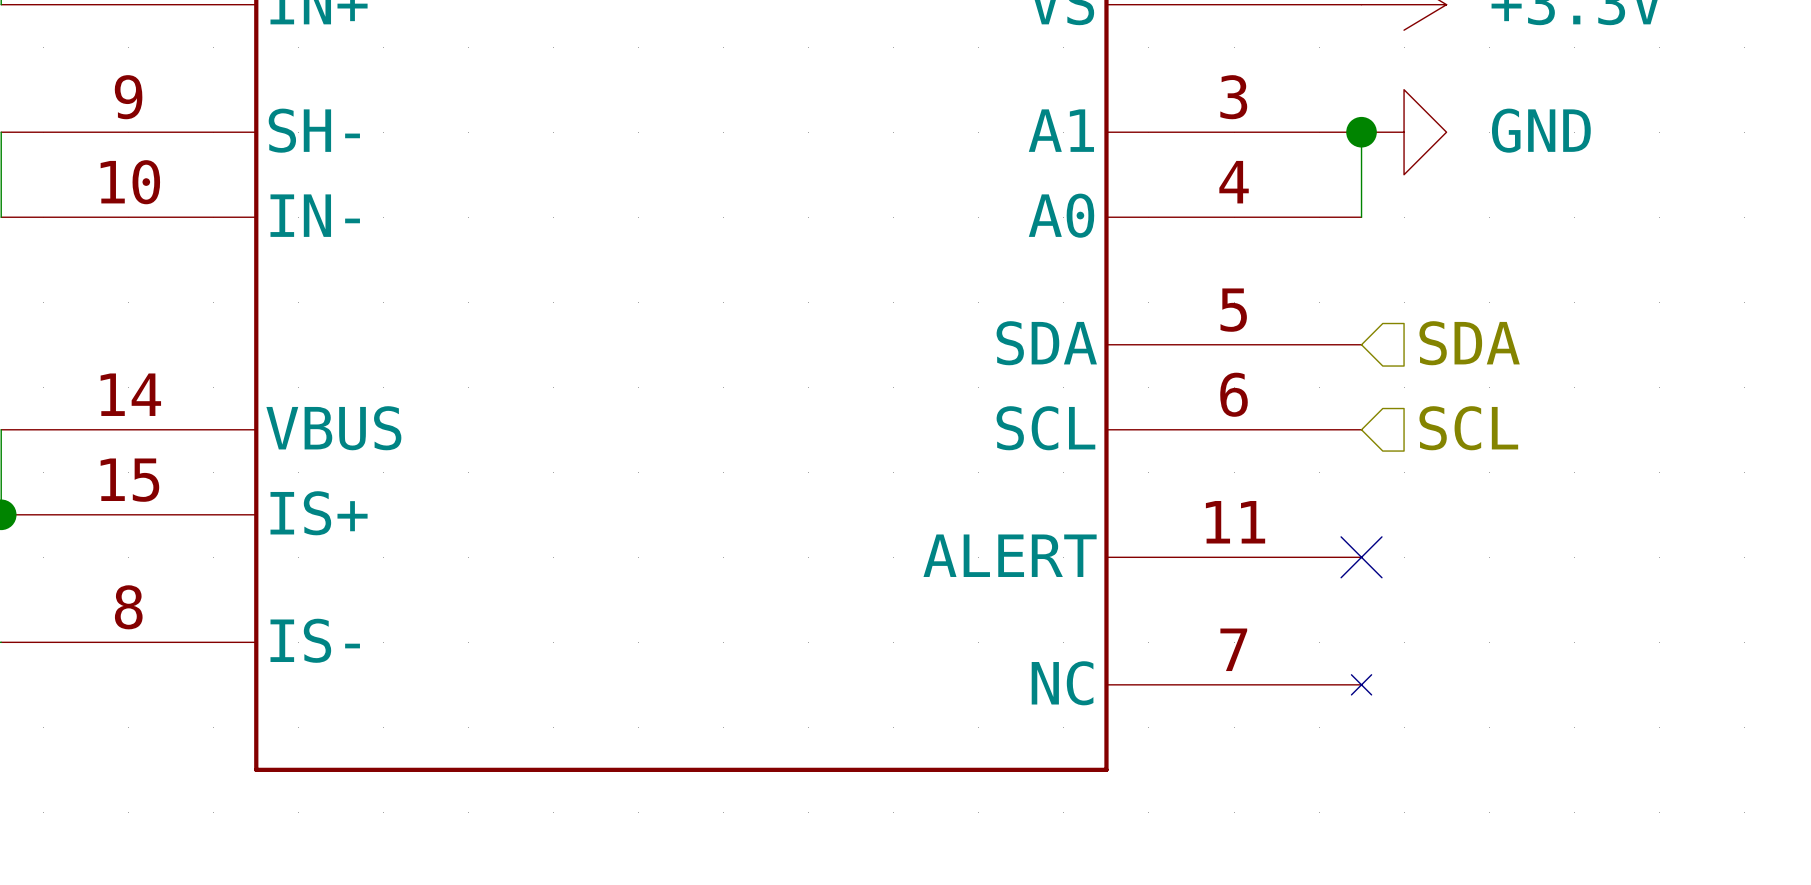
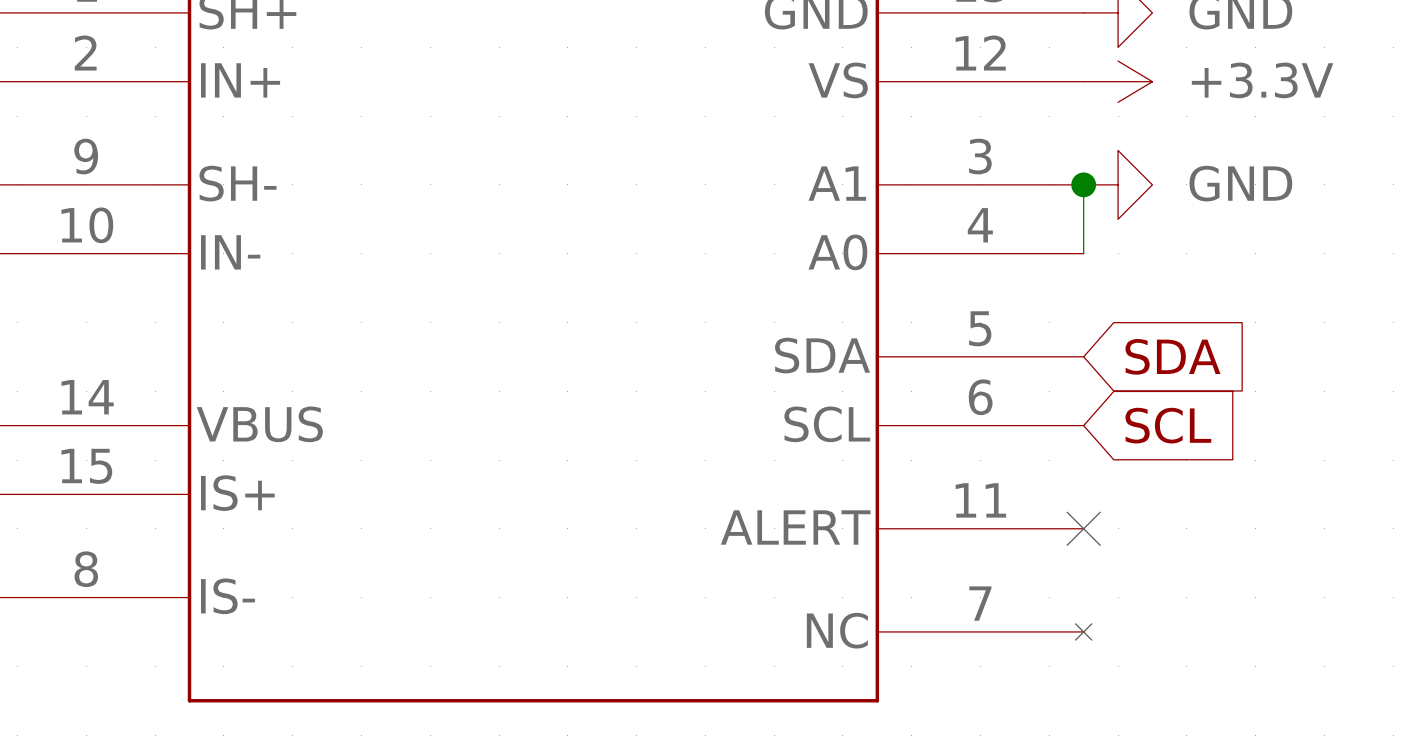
hierarchical label: SDA (1469, 343) -> none
global label: none -> SDA (1172, 356)
hierarchical label: SCL (1468, 428) -> none
global label: none -> SCL (1168, 425)

